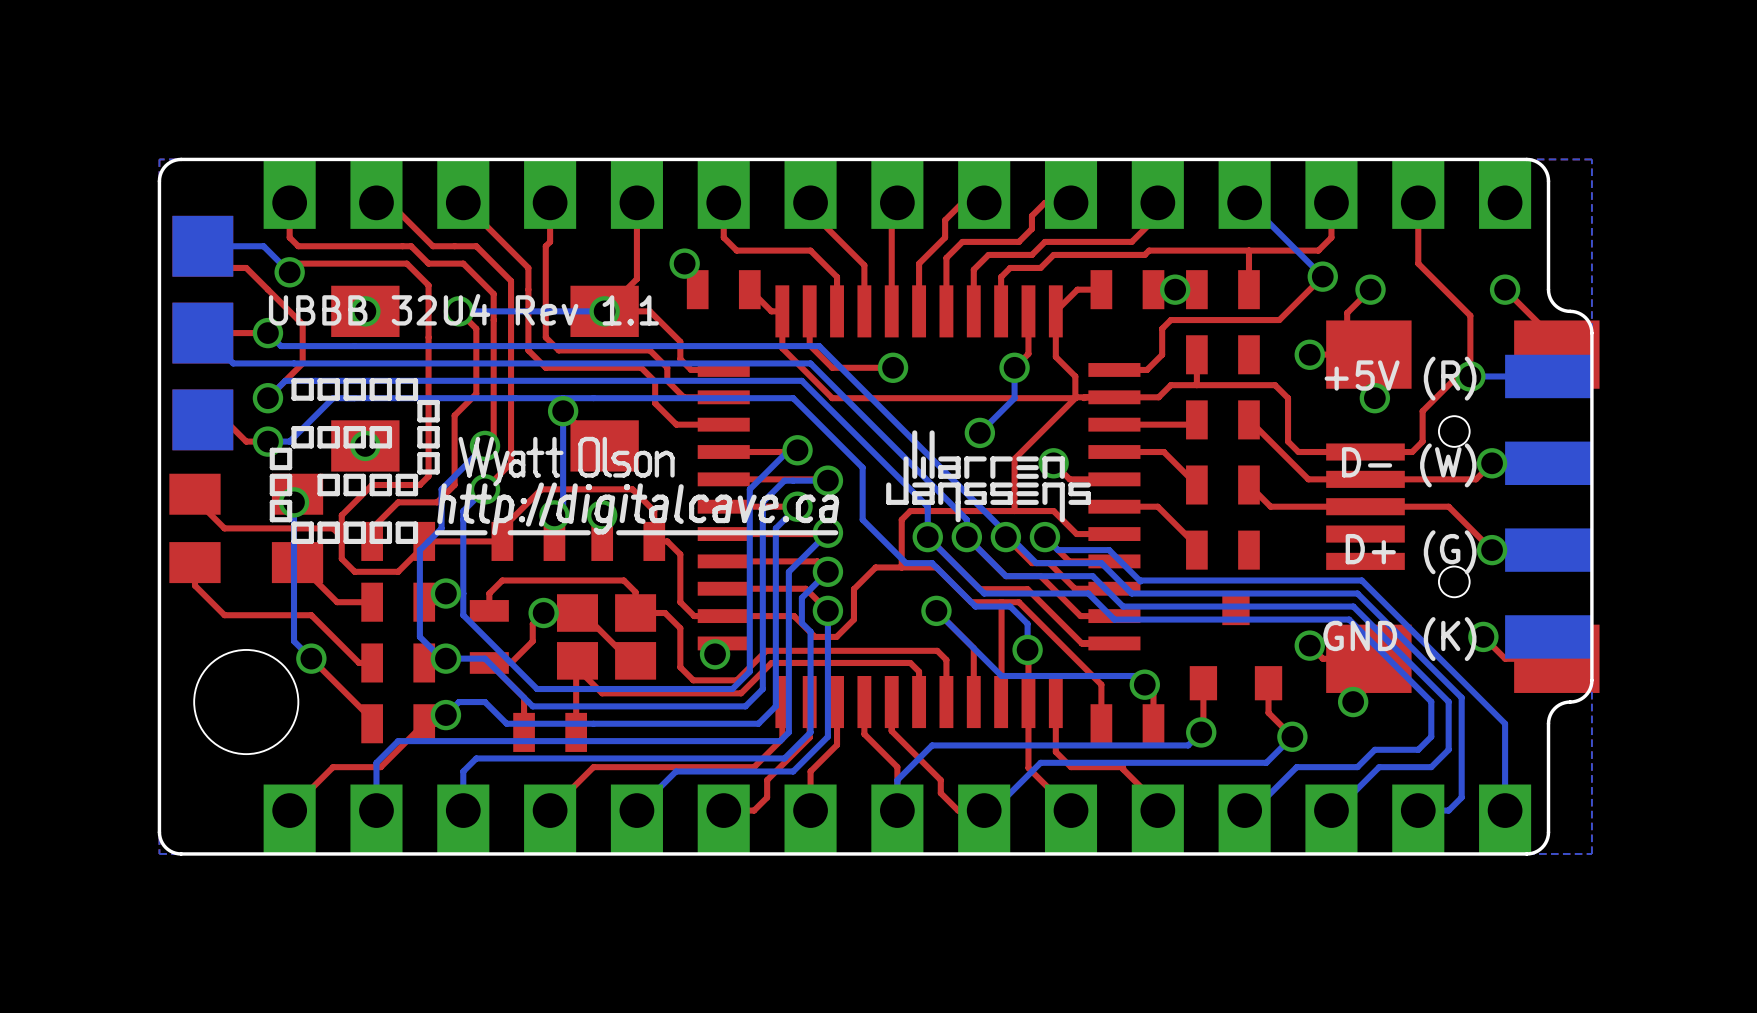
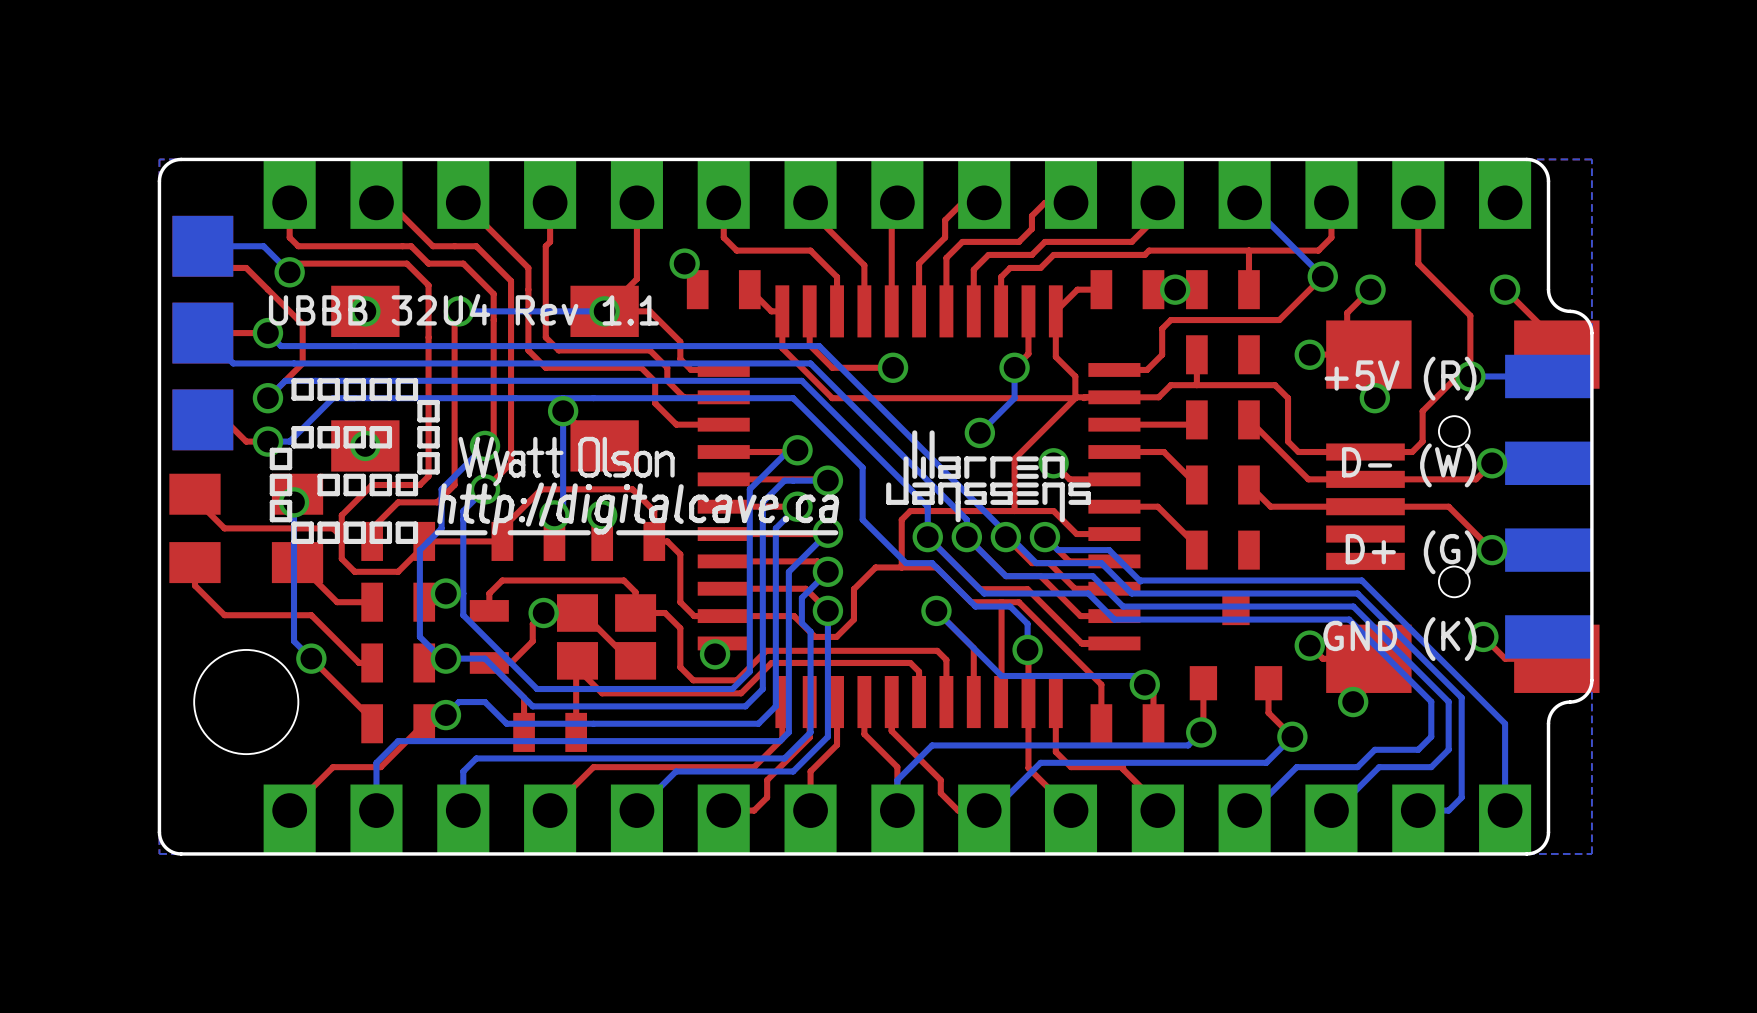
top track: (458, 311) (476, 328) (476, 393) (454, 415) -> (458, 311) (454, 315) (454, 415)

